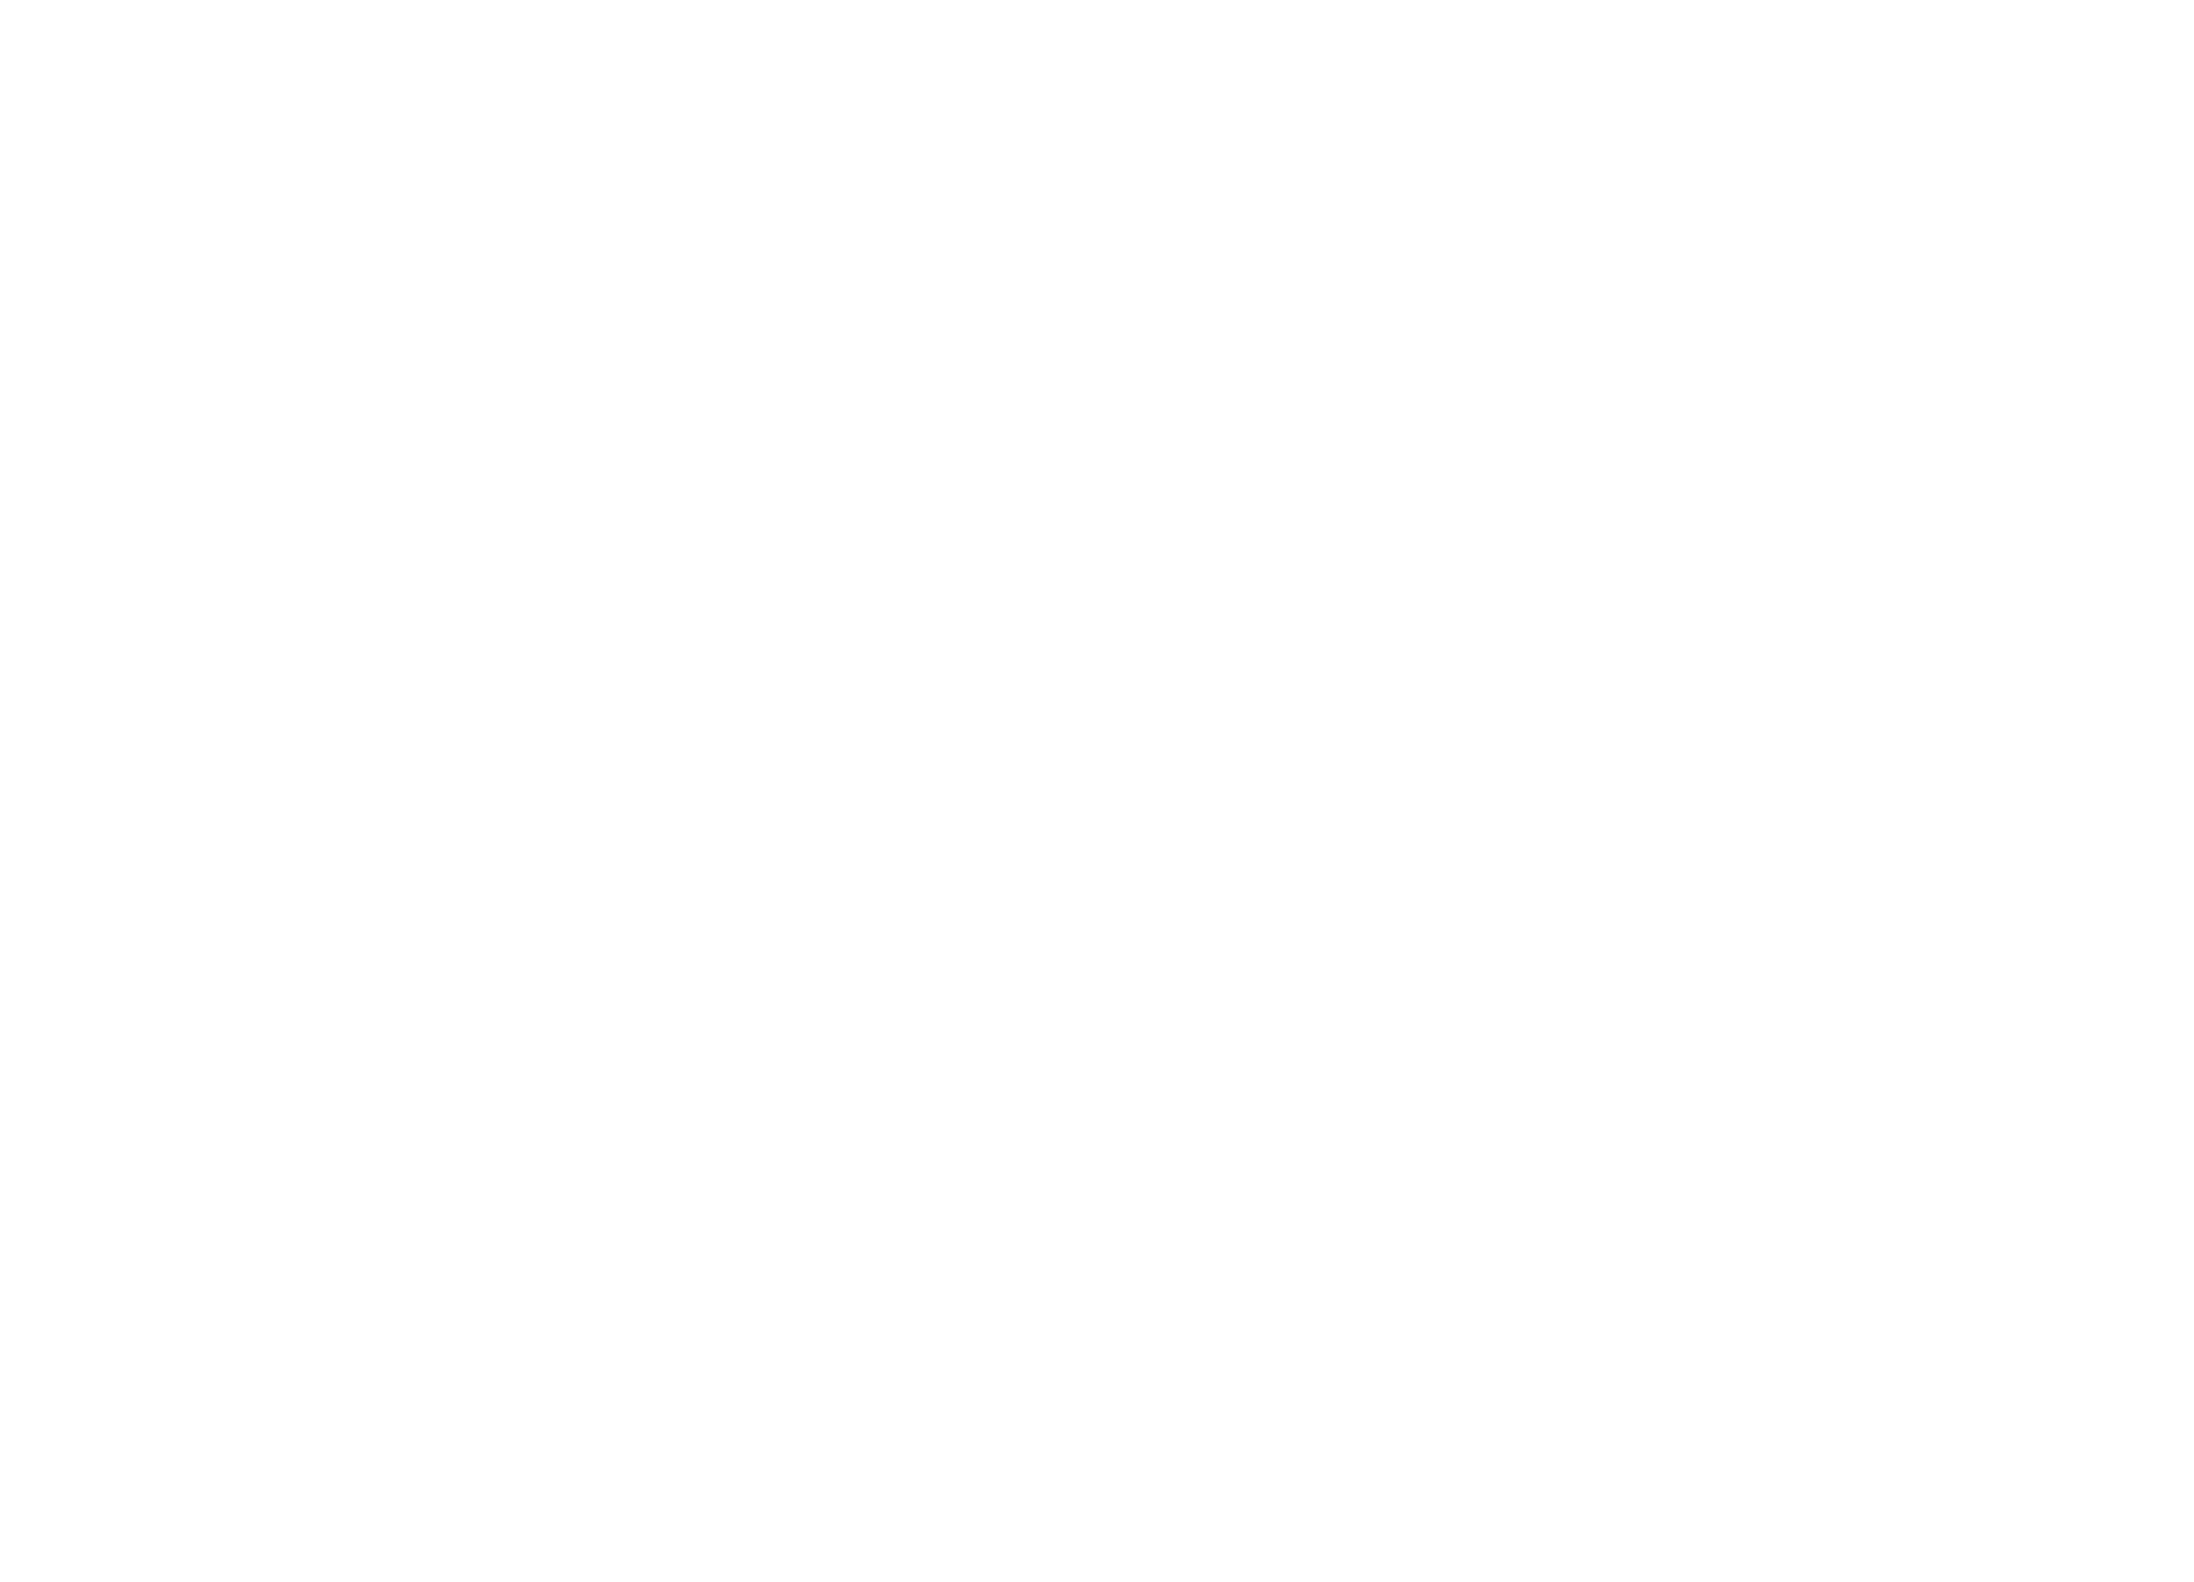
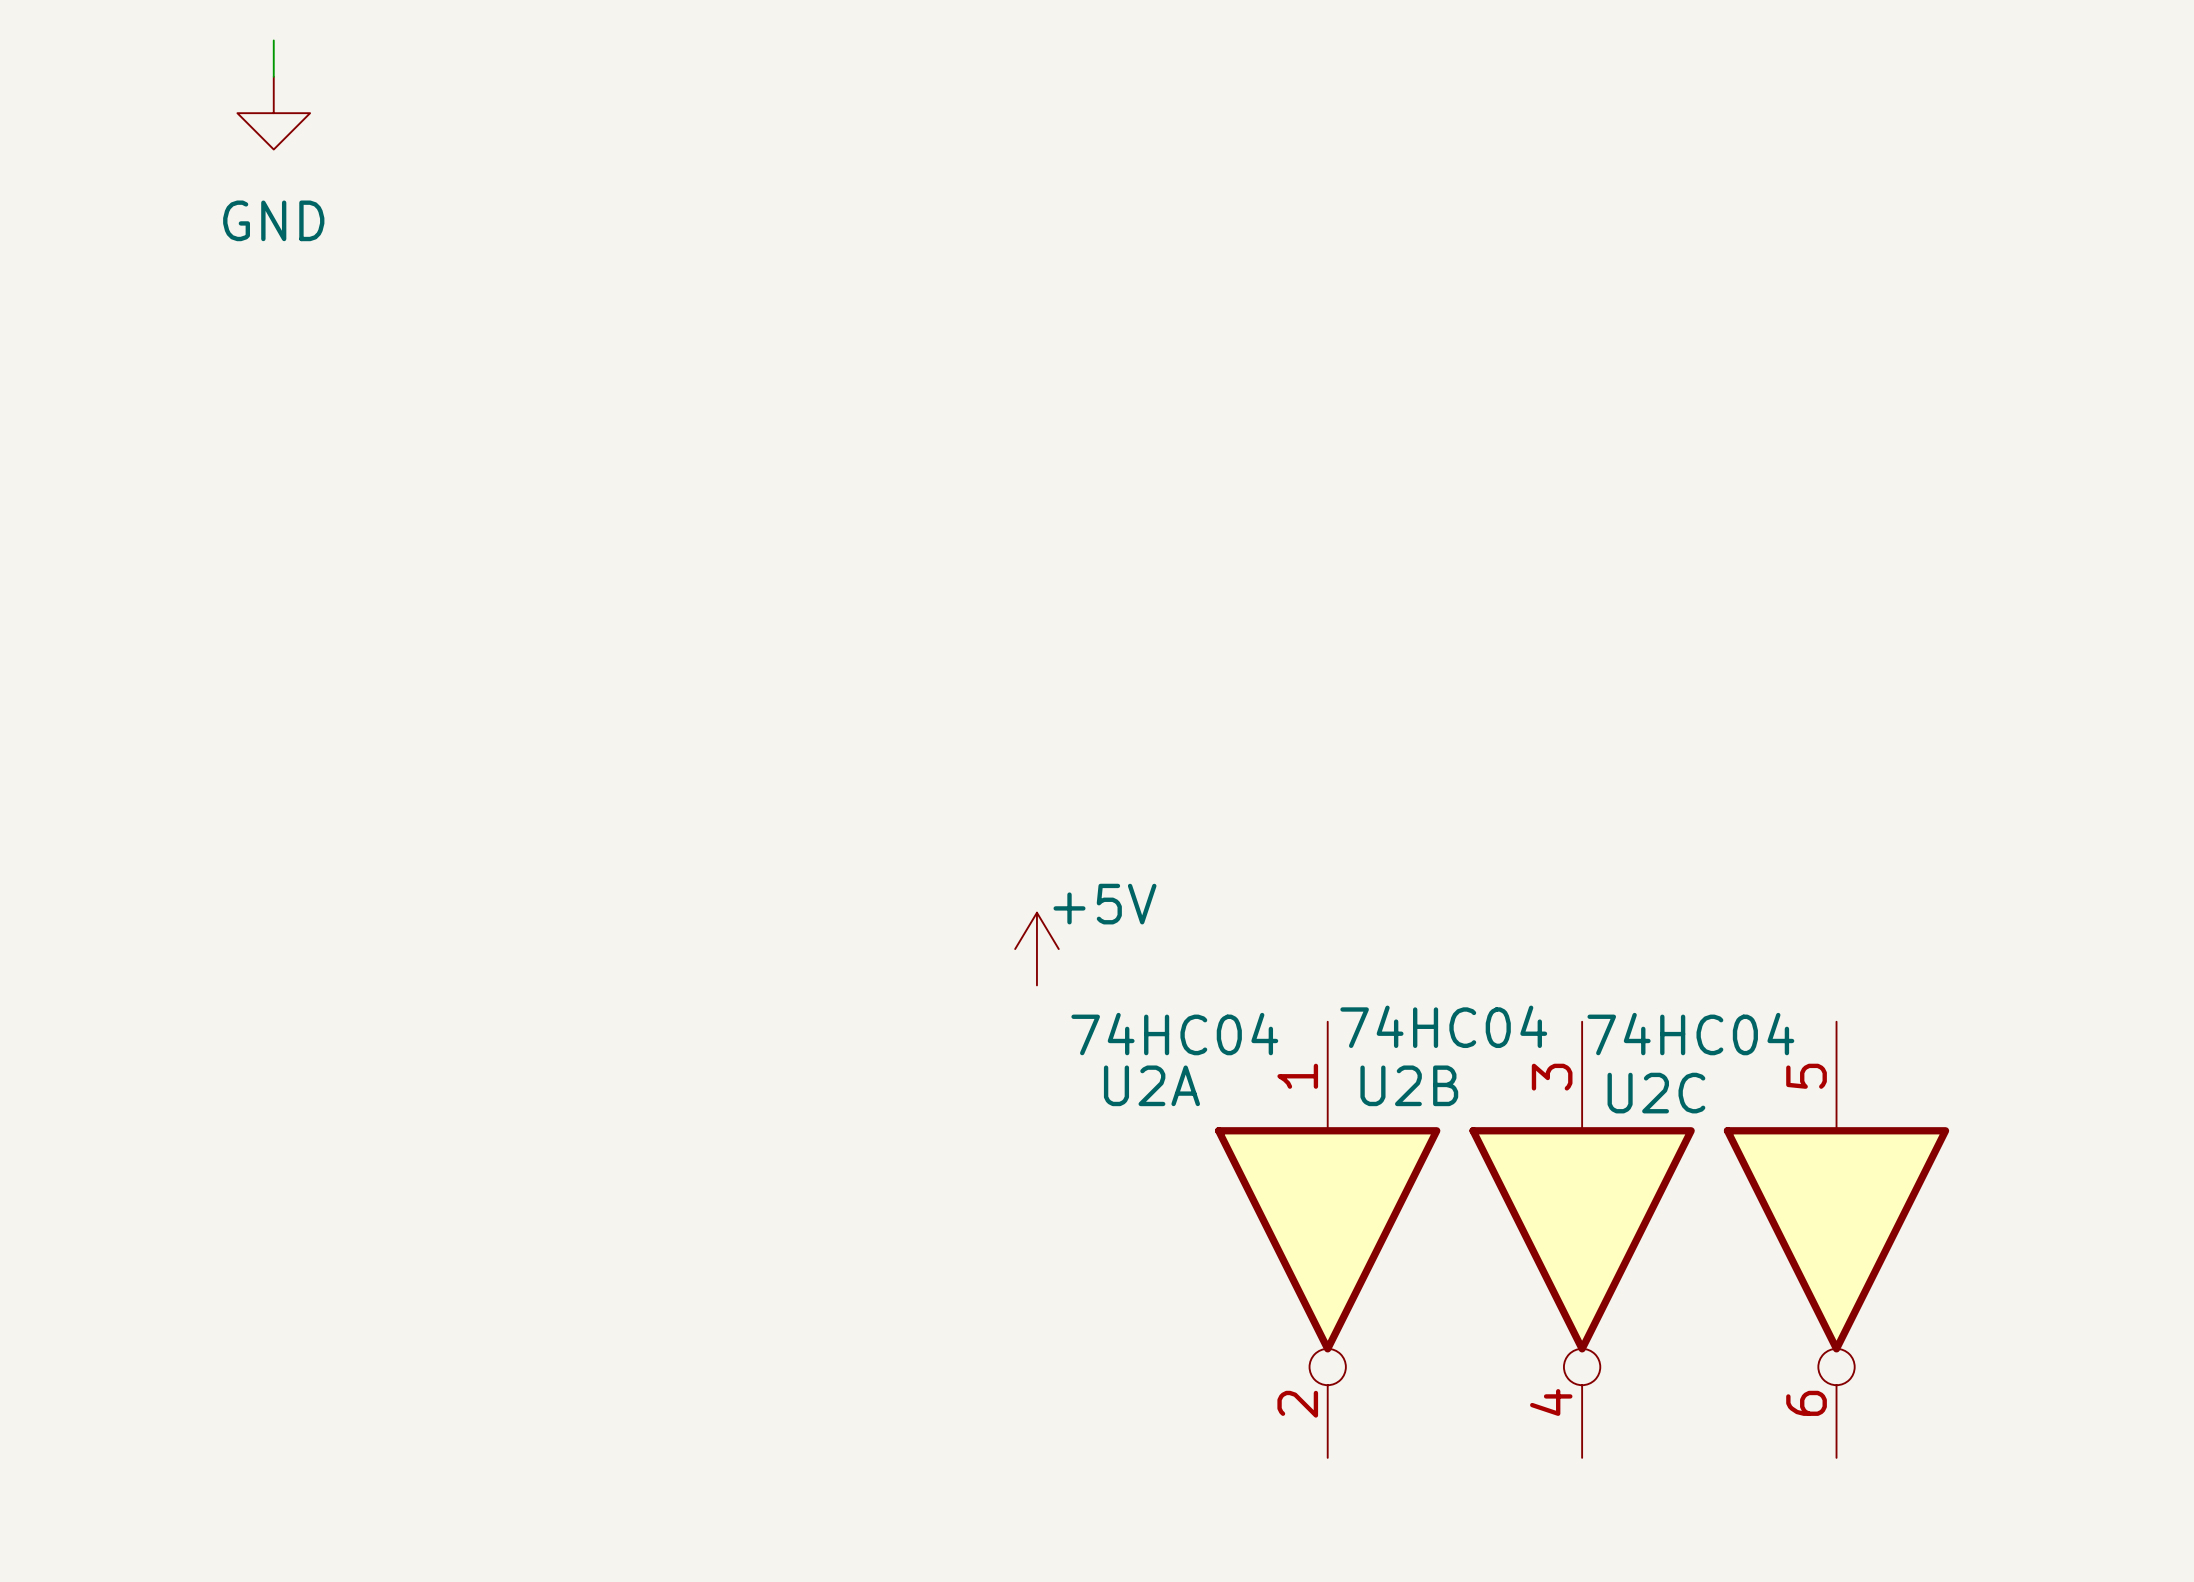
wire: none -> (273, 40) (273, 76)
power symbol: none -> GND (273, 113)
power symbol: none -> +5V (1036, 949)
U2A: none -> 74HC04 (1327, 1239)
U2B: none -> 74HC04 (1582, 1239)
U2C: none -> 74HC04 (1836, 1239)

